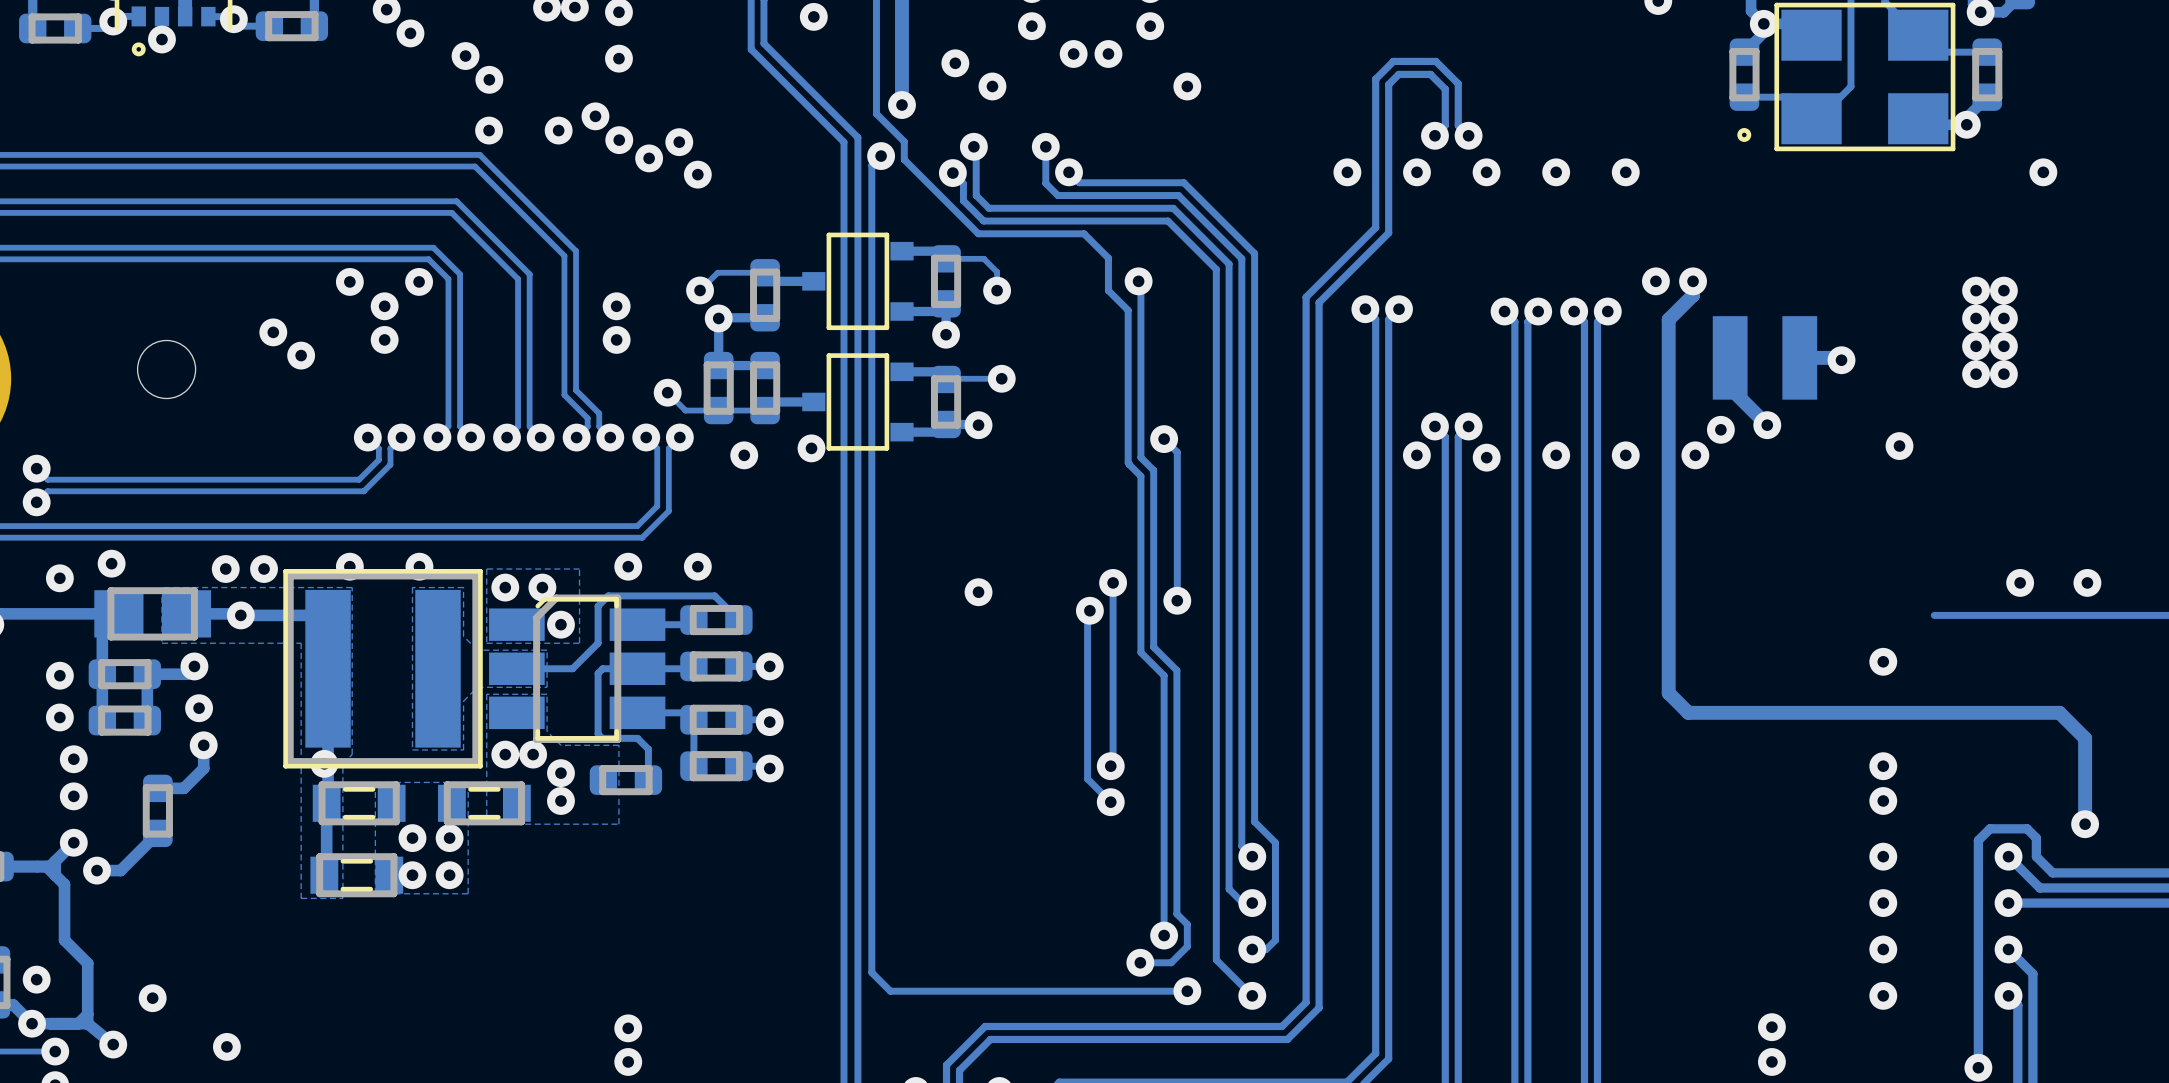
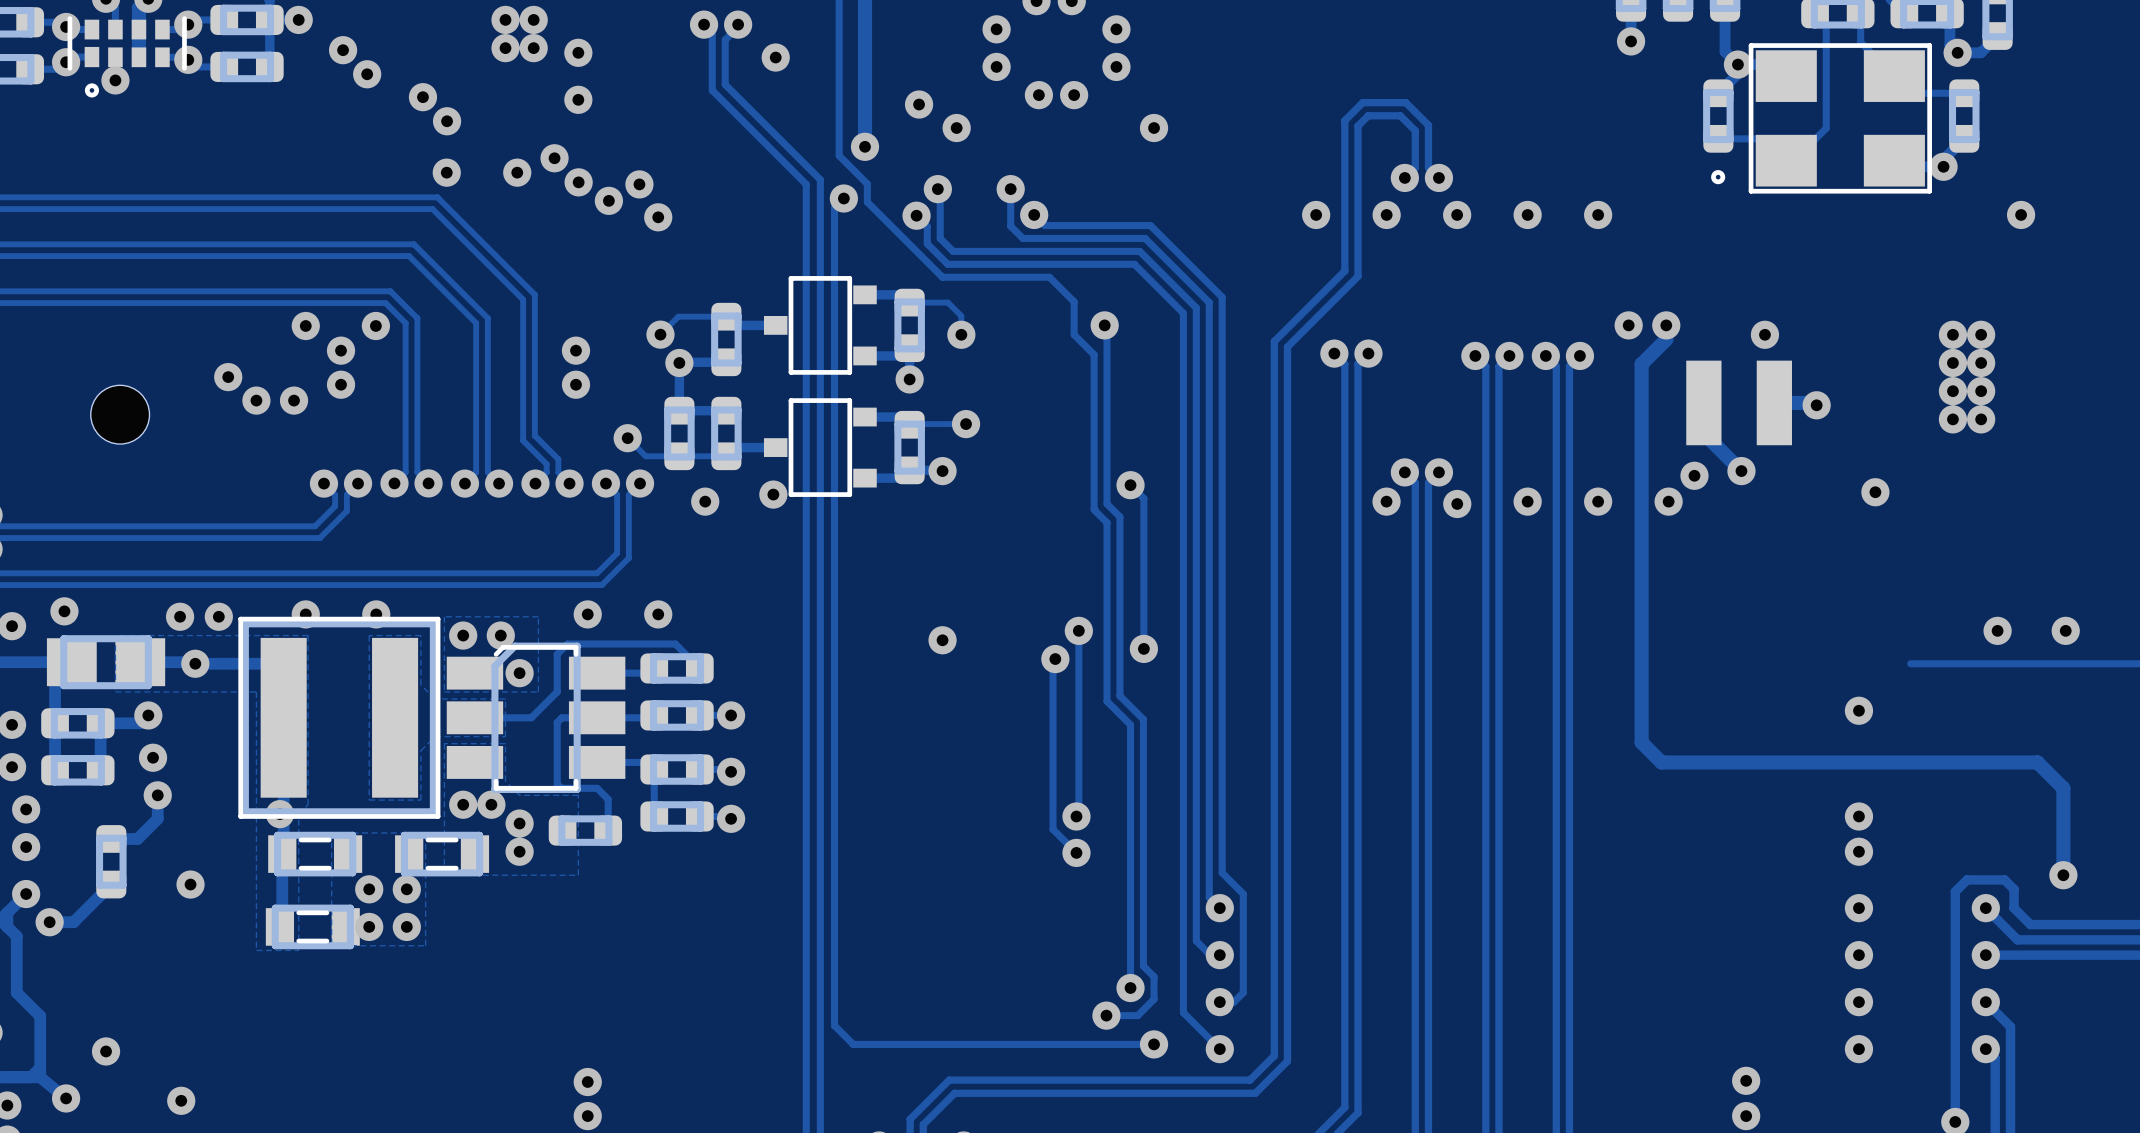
via: none -> (1764, 334)
via: none -> (294, 400)
via: none -> (190, 884)

